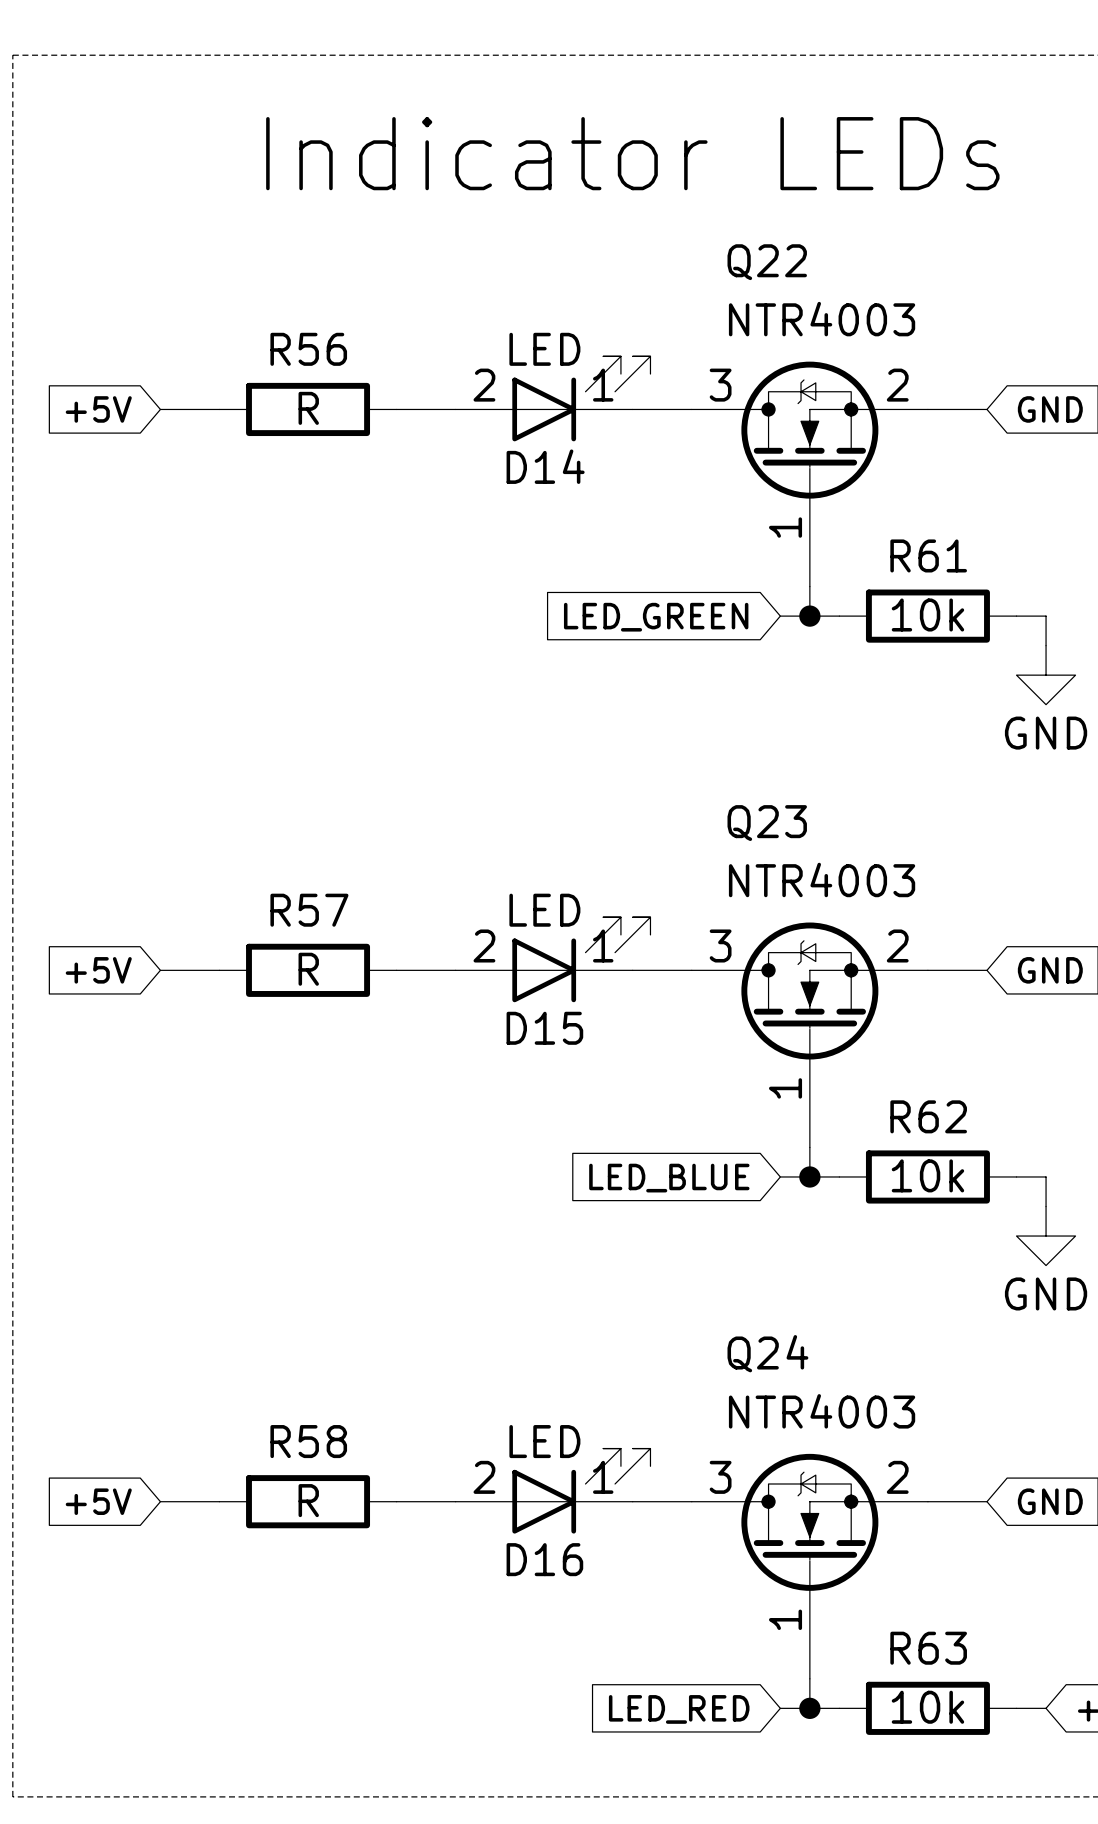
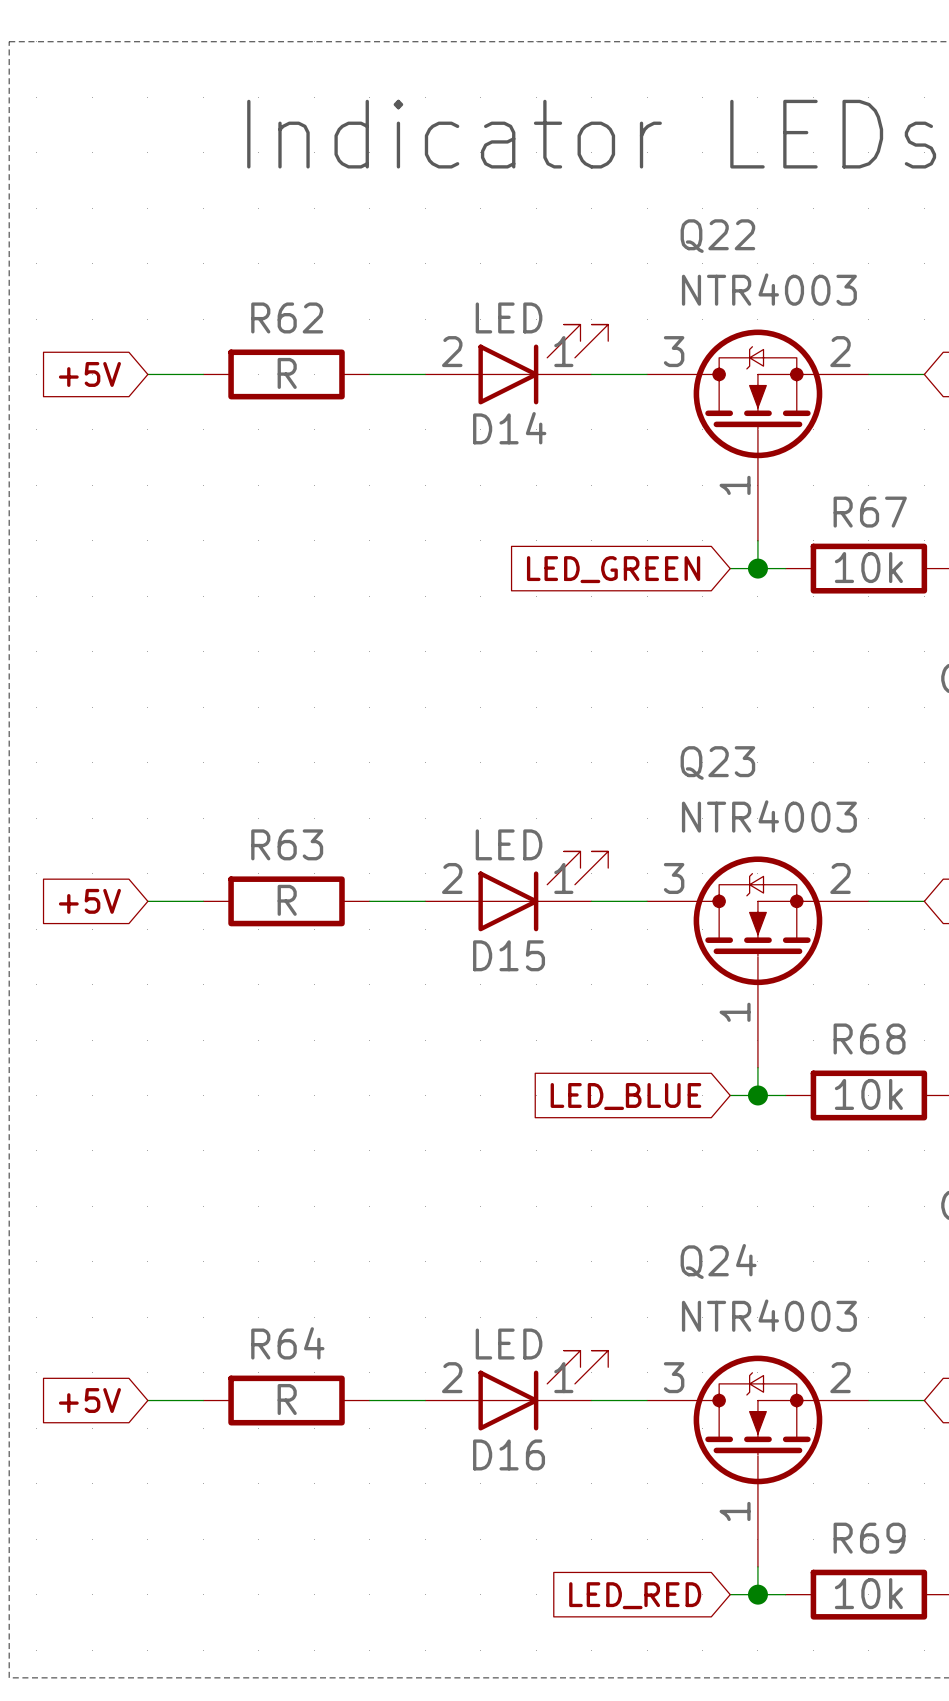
R56 name: R56 (308, 349) -> R62 (287, 317)
R61 name: R61 (928, 555) -> R67 (870, 512)
R57 name: R57 (309, 910) -> R63 (287, 844)
R62 name: R62 (928, 1116) -> R68 (869, 1038)
R58 name: R58 (308, 1441) -> R64 (287, 1343)
R63 name: R63 (928, 1648) -> R69 (869, 1538)

